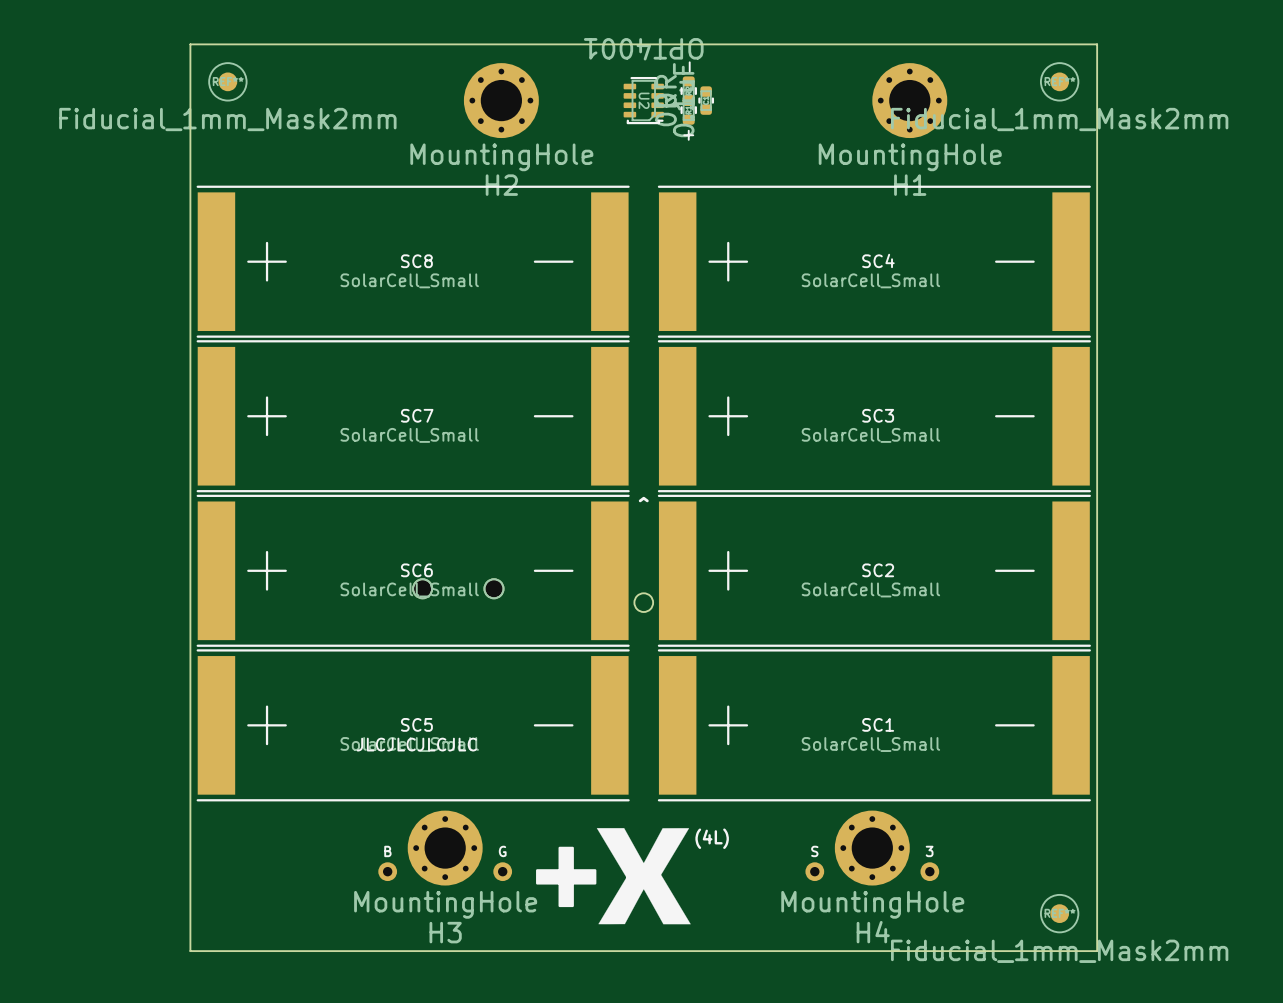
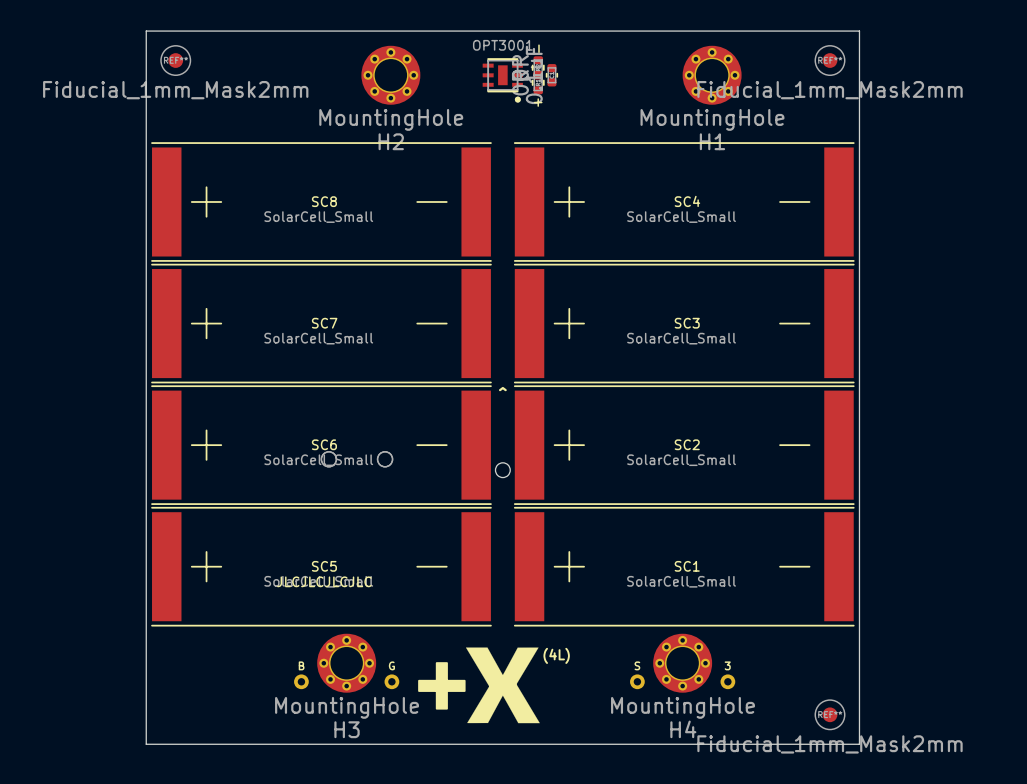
U2: OPT4001 (643, 100) -> none
part: none -> OPT3001 (502, 80)

